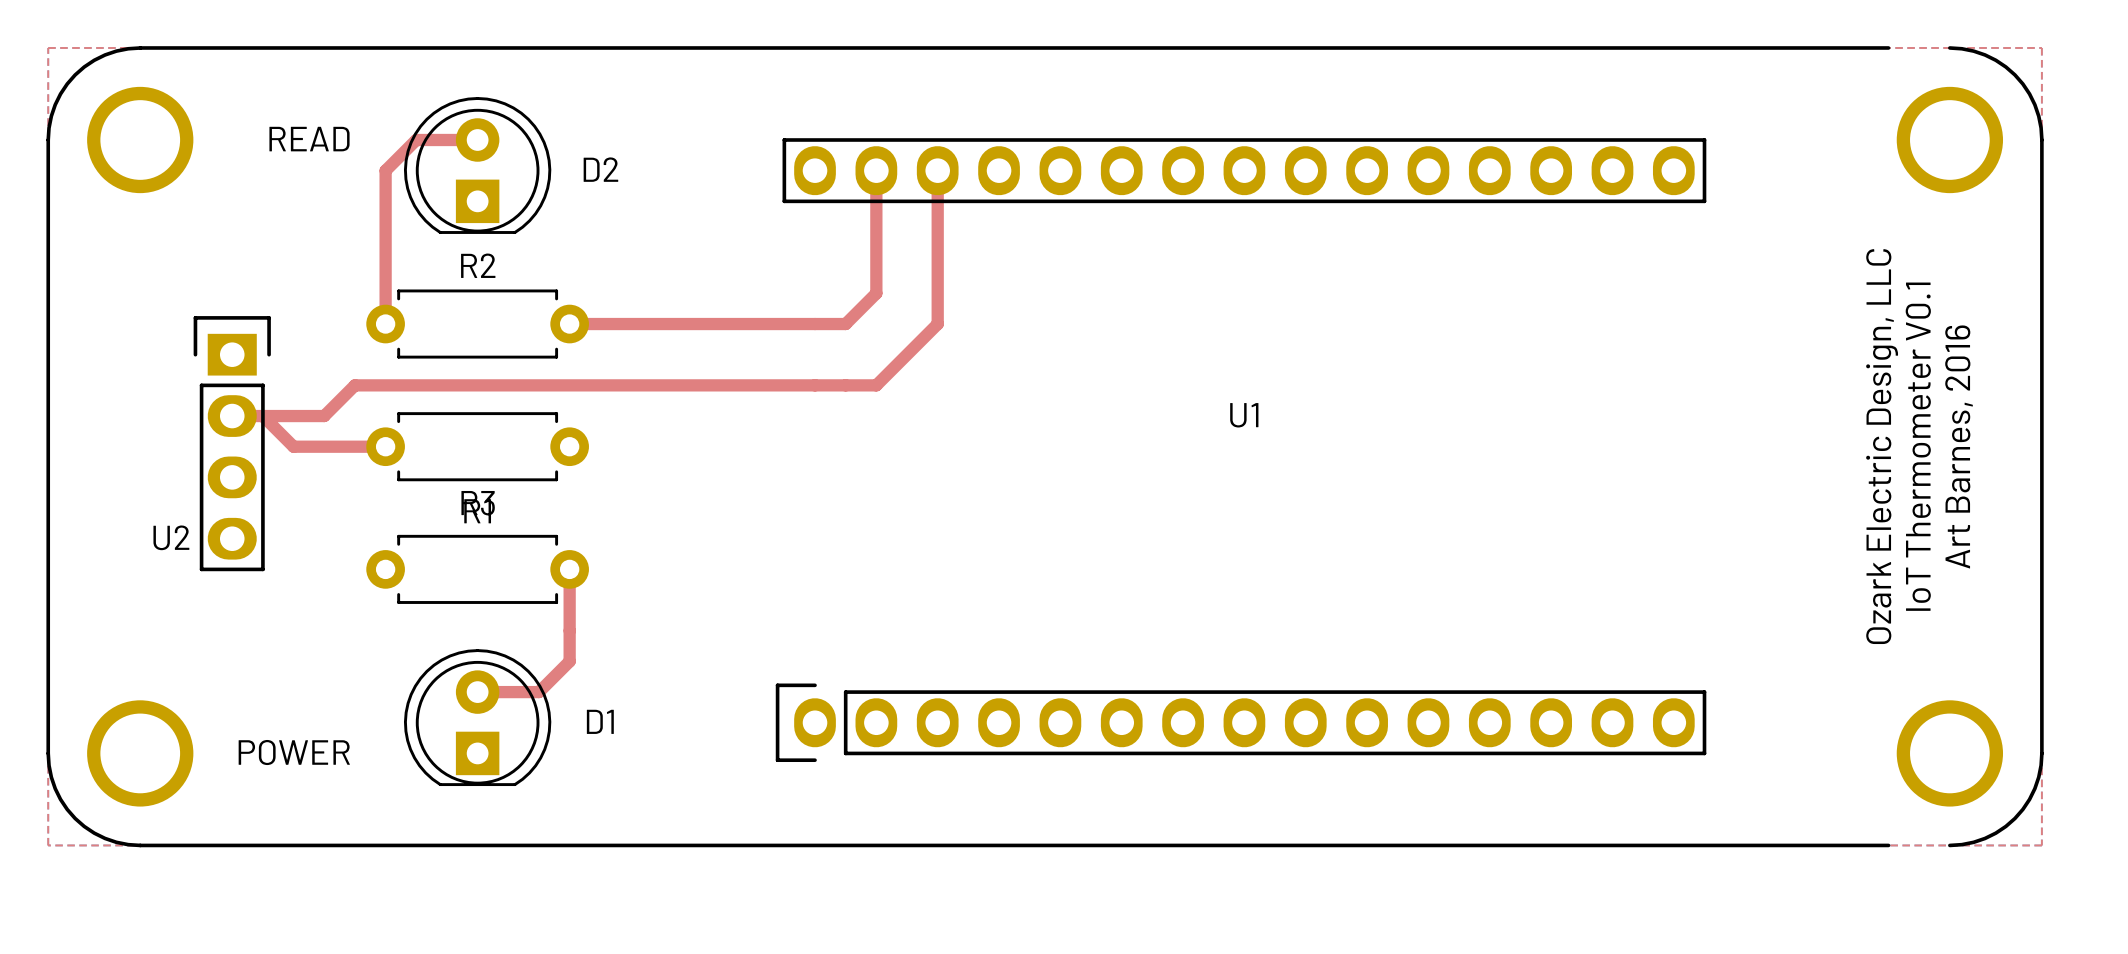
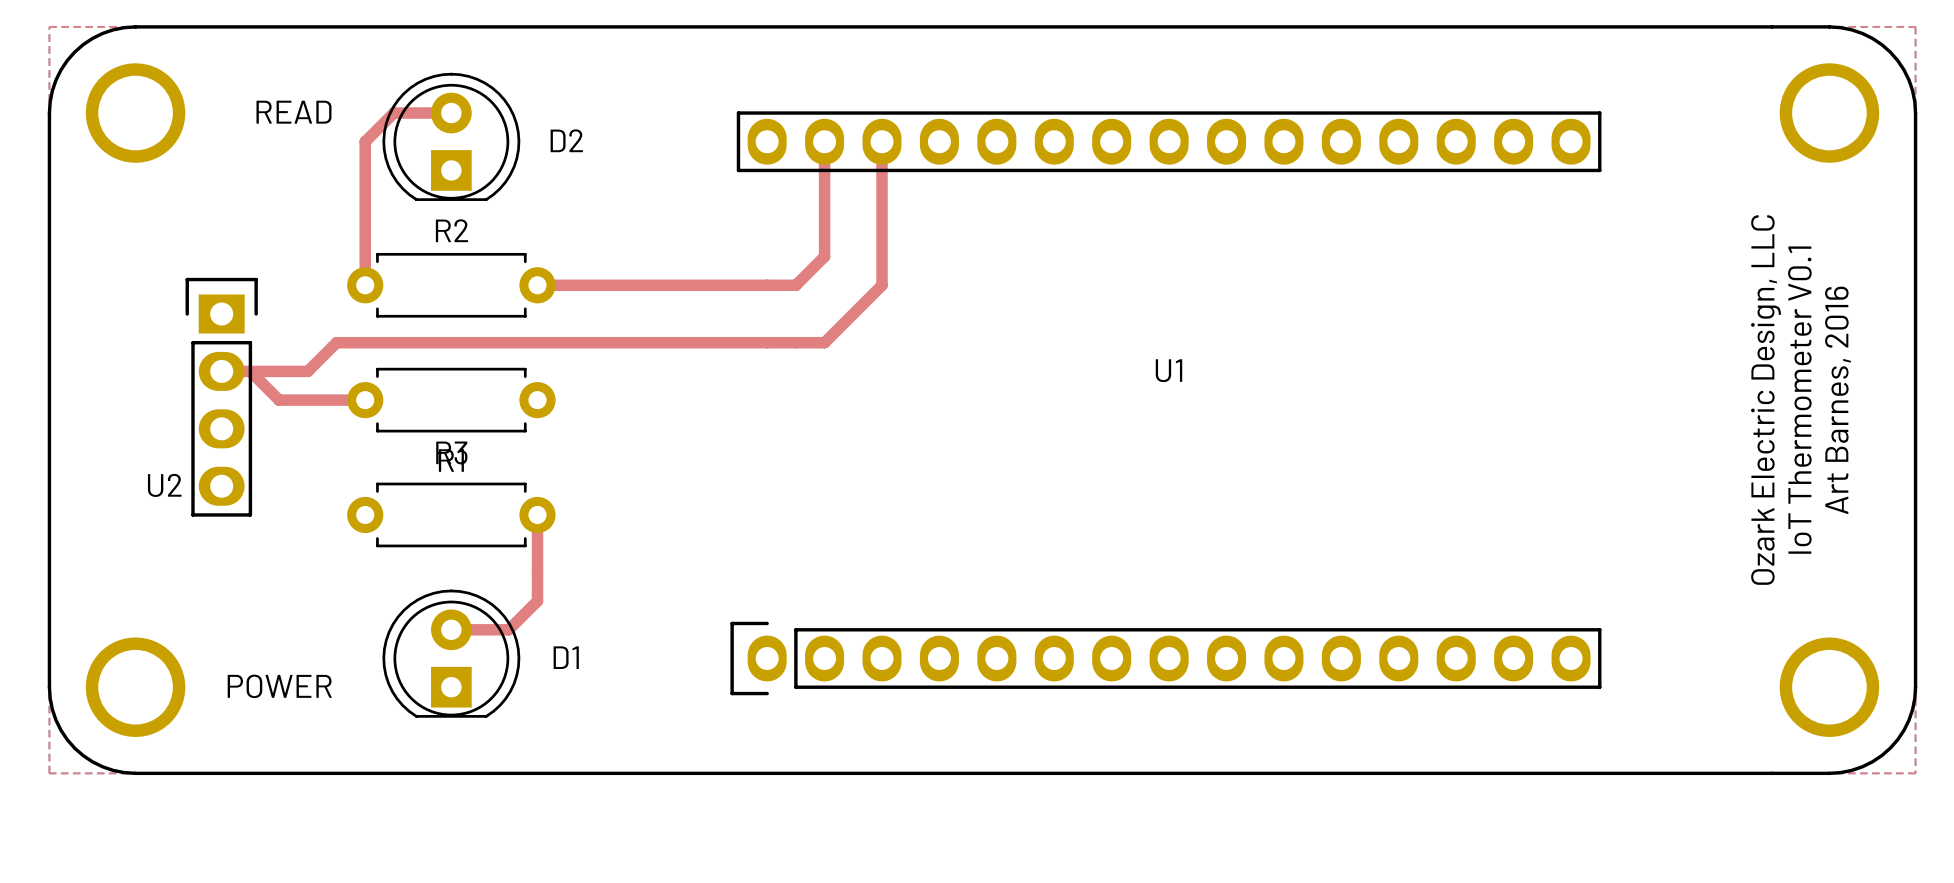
board edge: none -> (1772, 26) (1829, 26)
board edge: none -> (1772, 773) (1829, 773)

